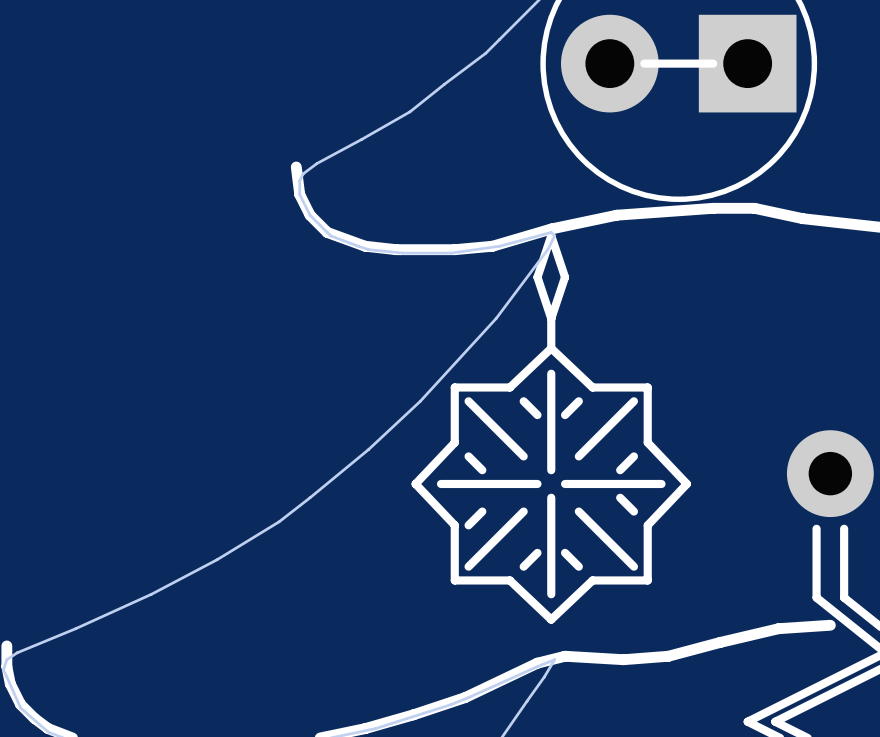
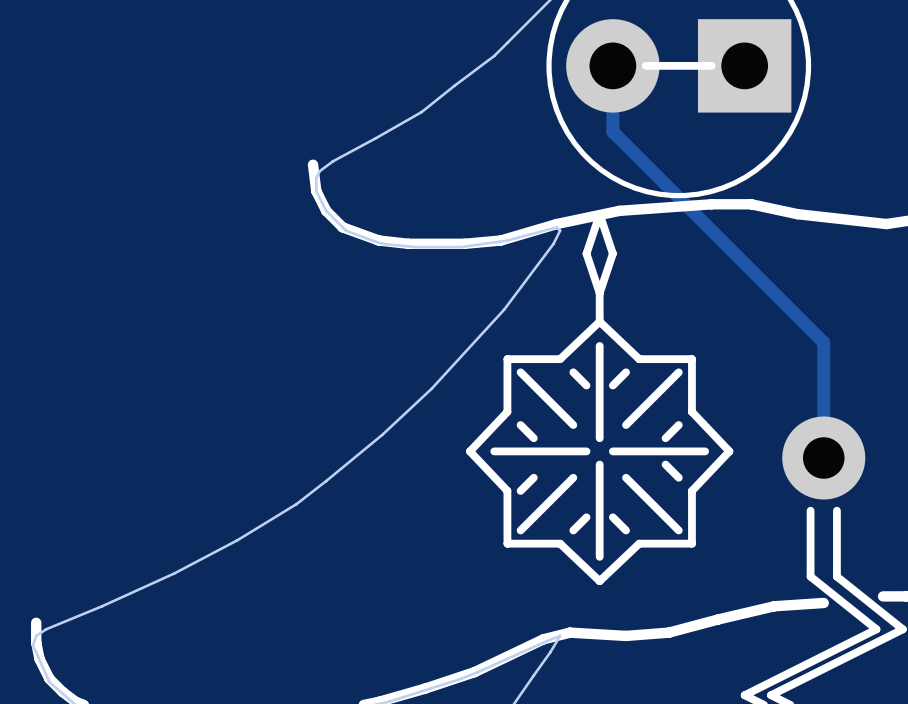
track: none -> (612, 65) (612, 131) (823, 342) (823, 457)
drawing position: (551, 427) -> (599, 397)

